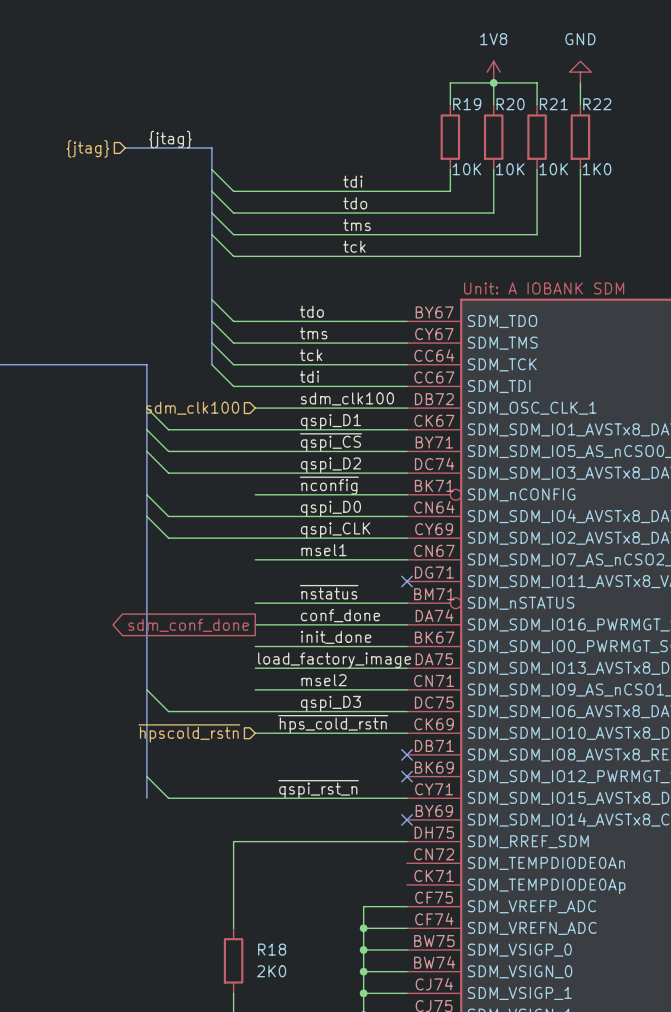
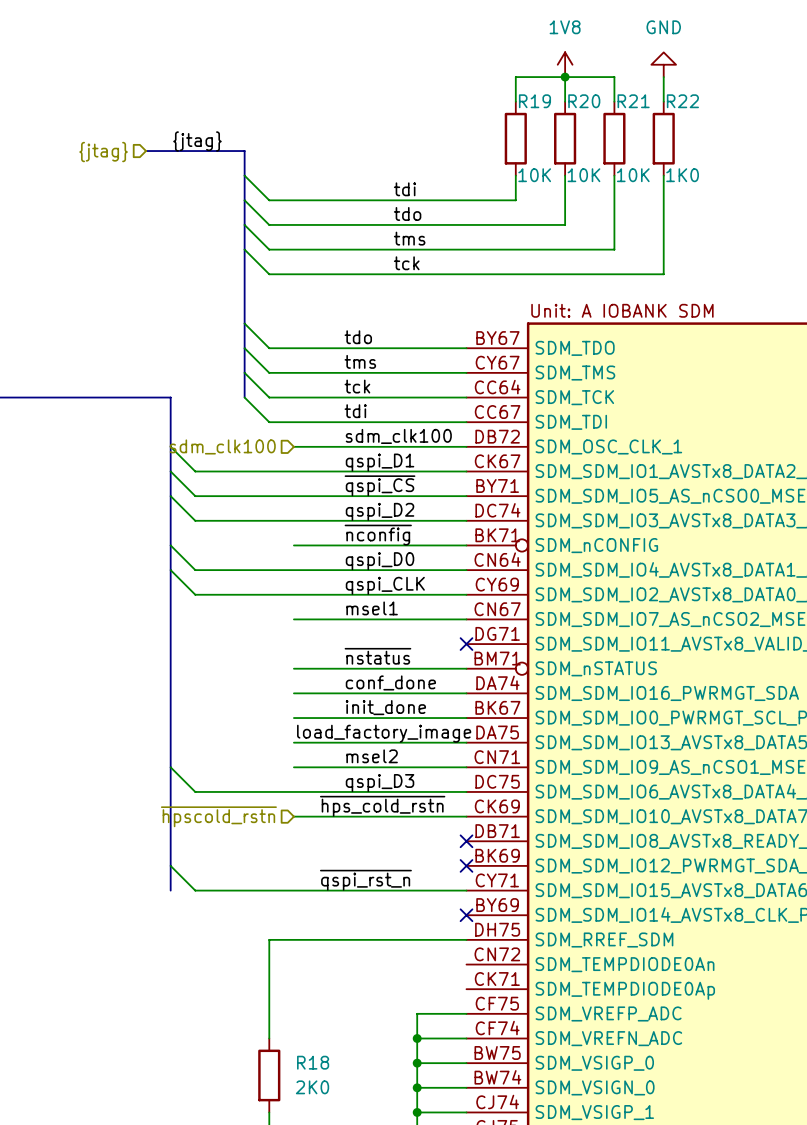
global label: sdm_conf_done (188, 625) -> none

